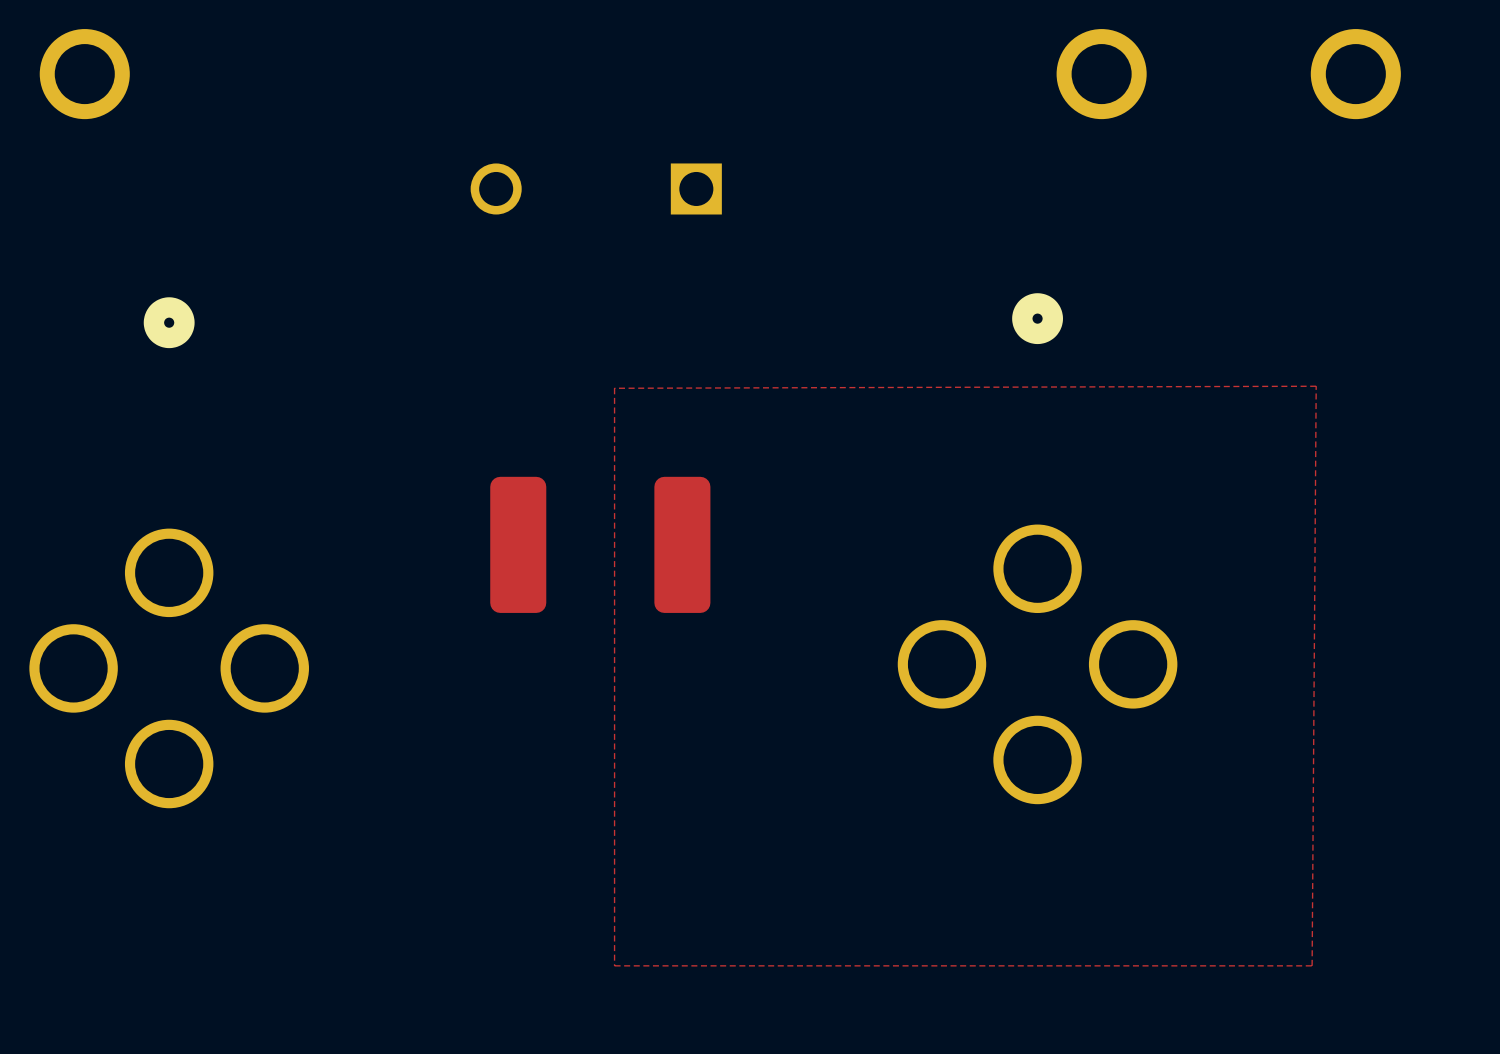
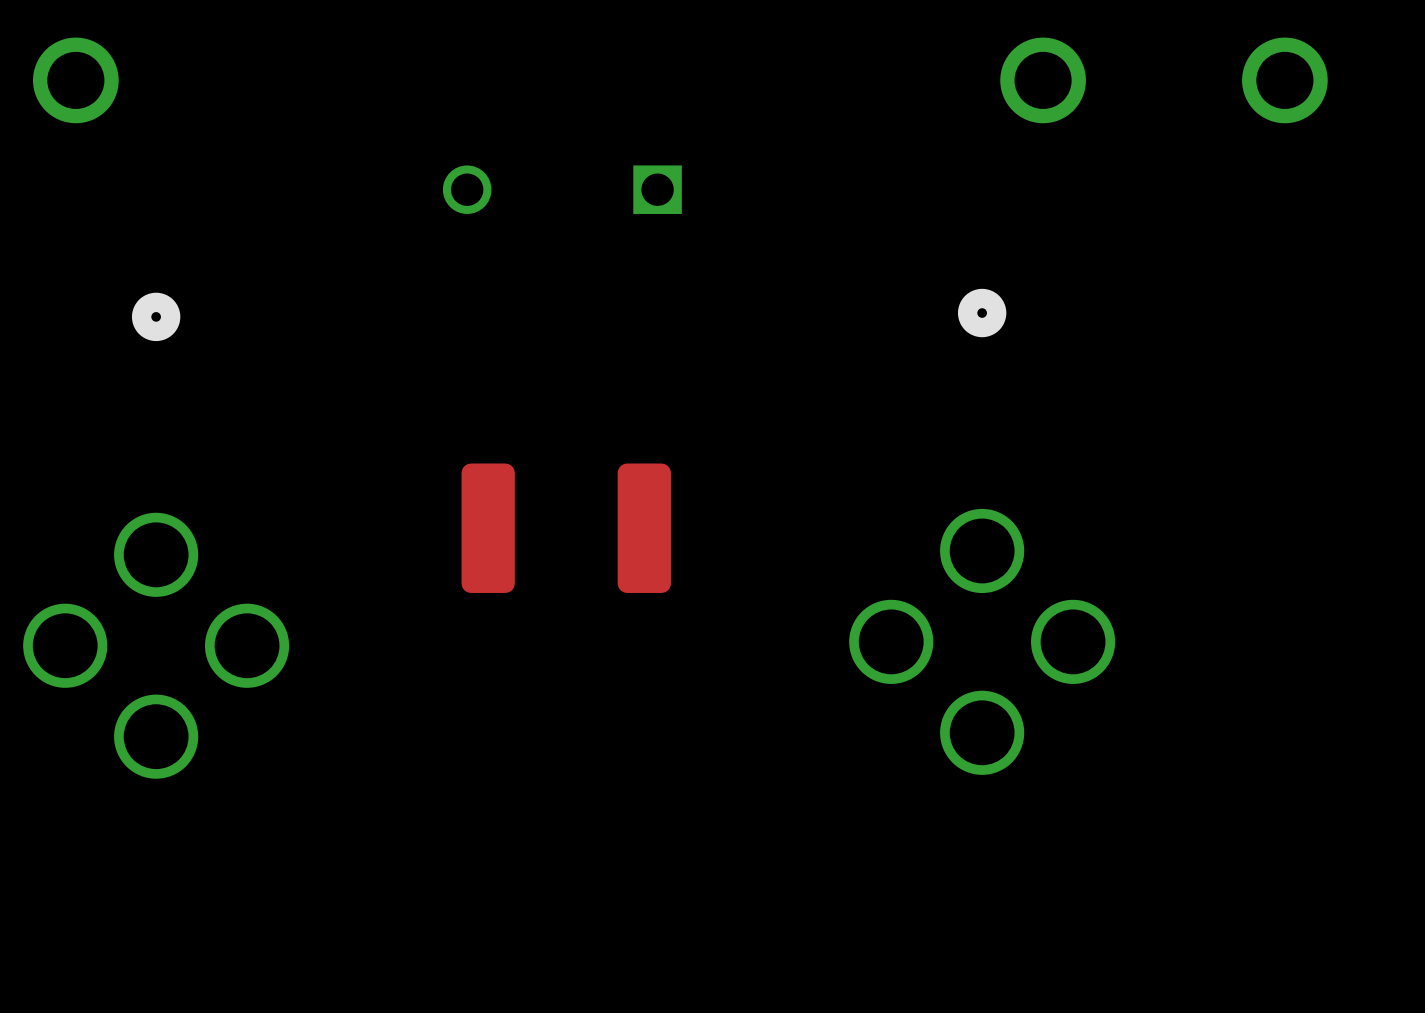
top zone outline: (1316, 386) (614, 388) (614, 965) (1312, 965) (1316, 386) -> none

